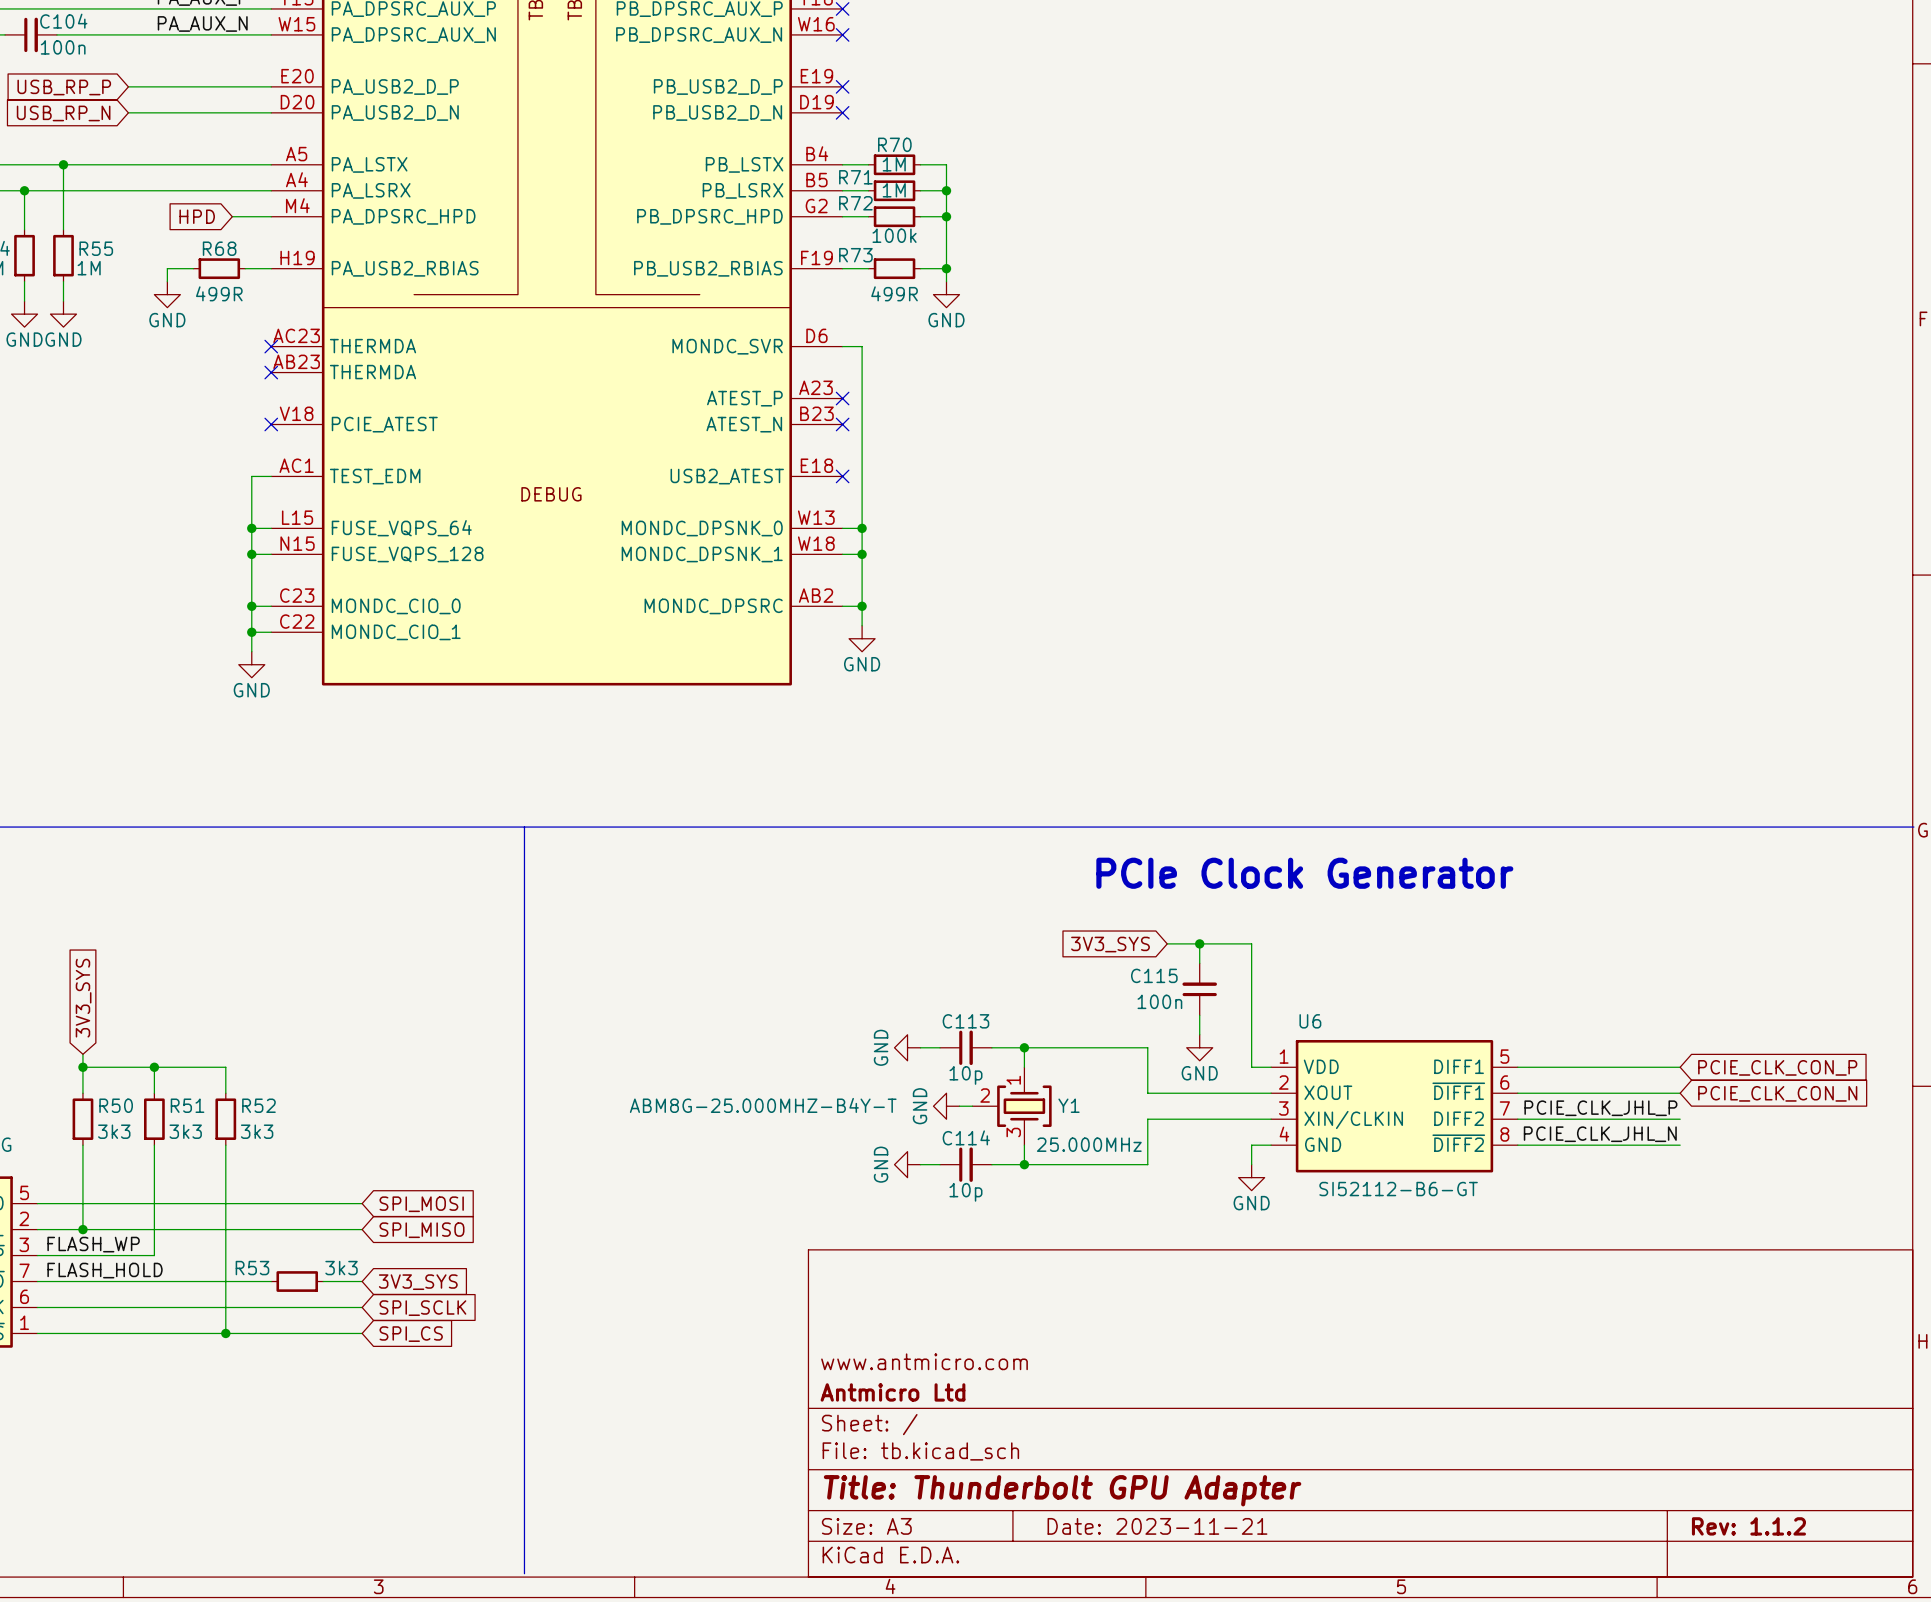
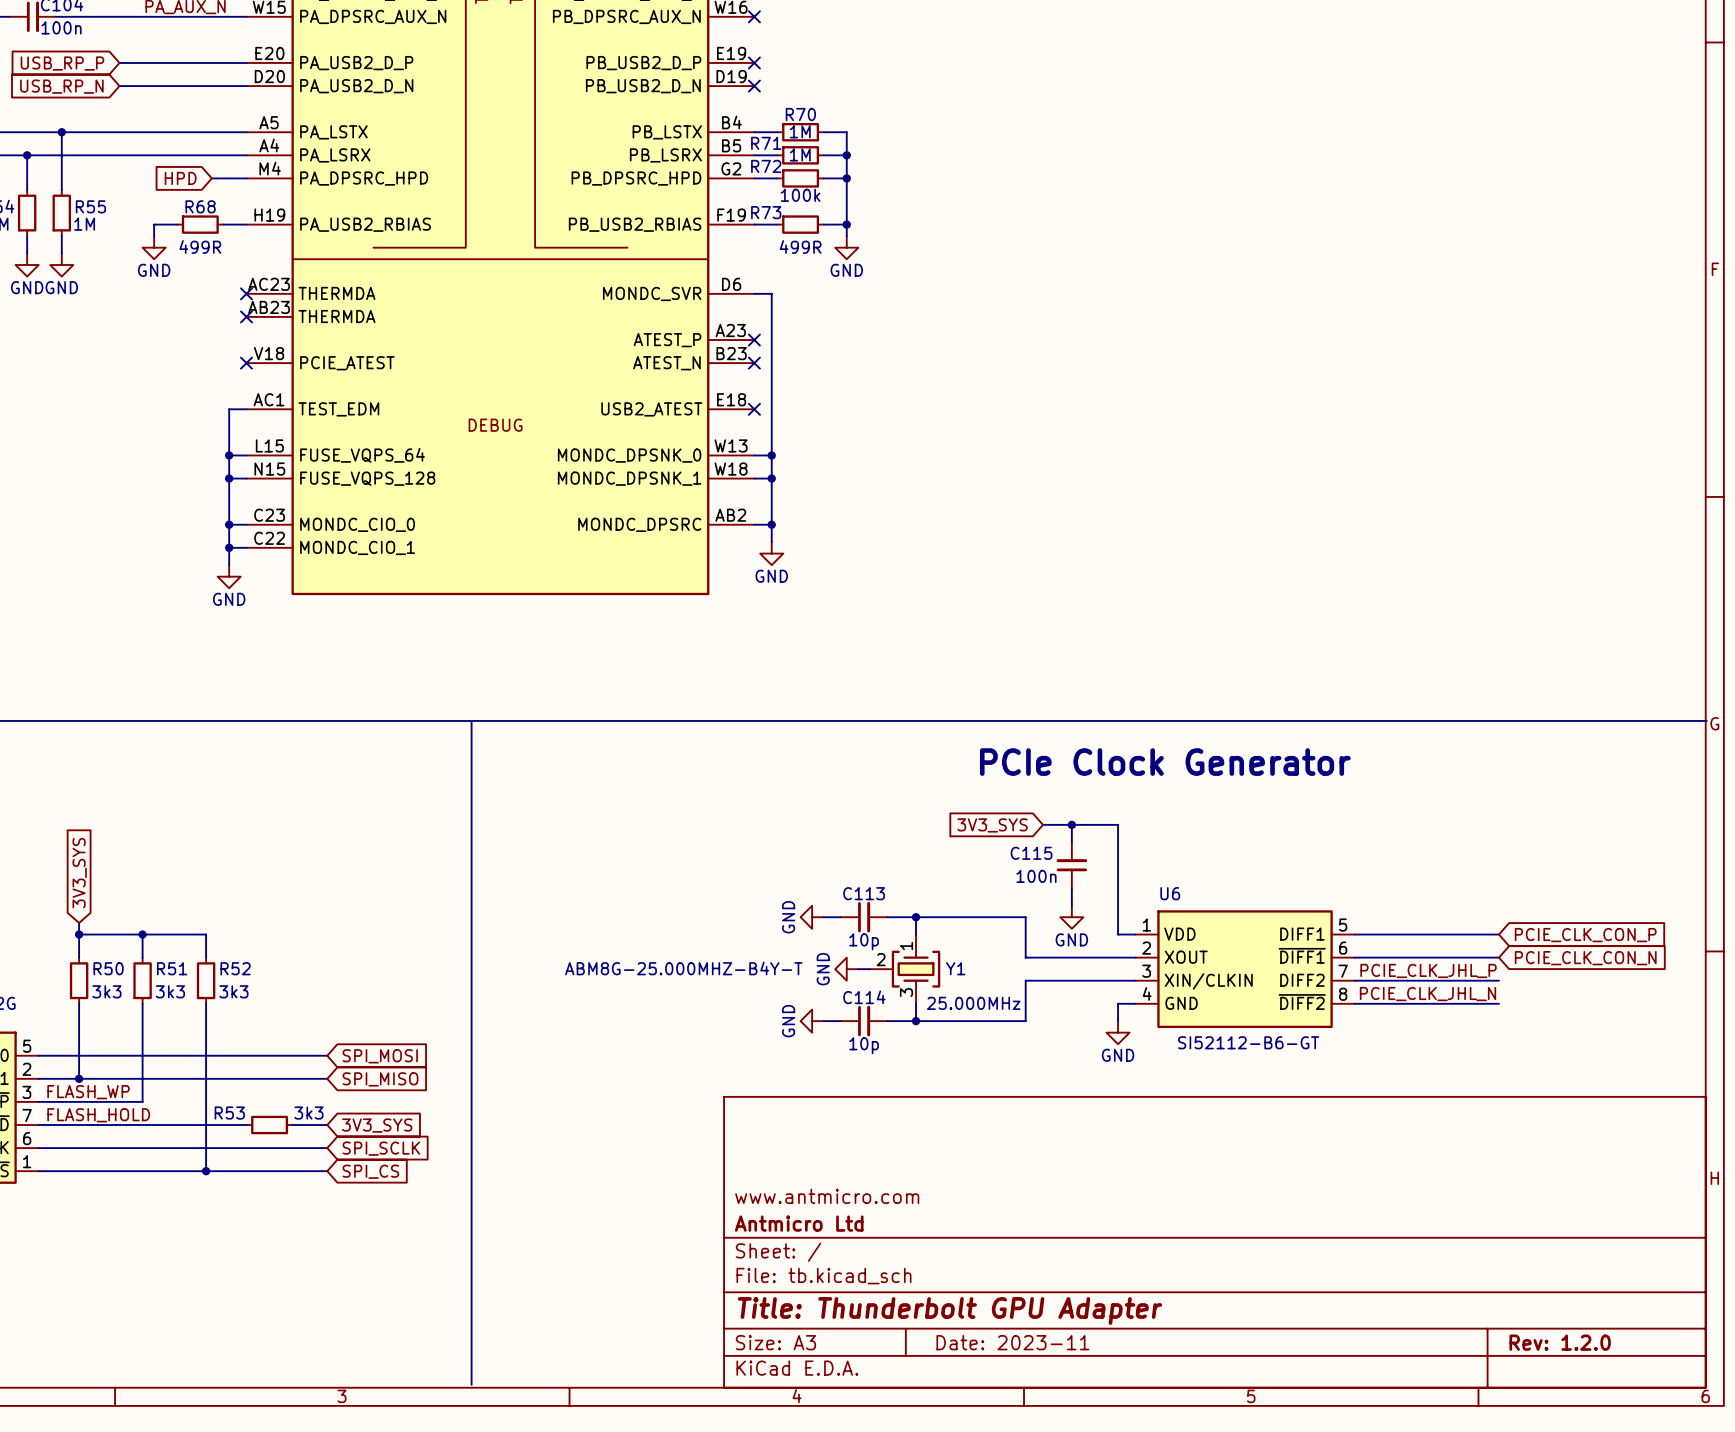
title block: Date: 2023-11-21 (1157, 1526) -> Date: 2023-11 (1012, 1342)
title block: Rev: 1.1.2 (1748, 1526) -> Rev: 1.2.0 (1560, 1342)

